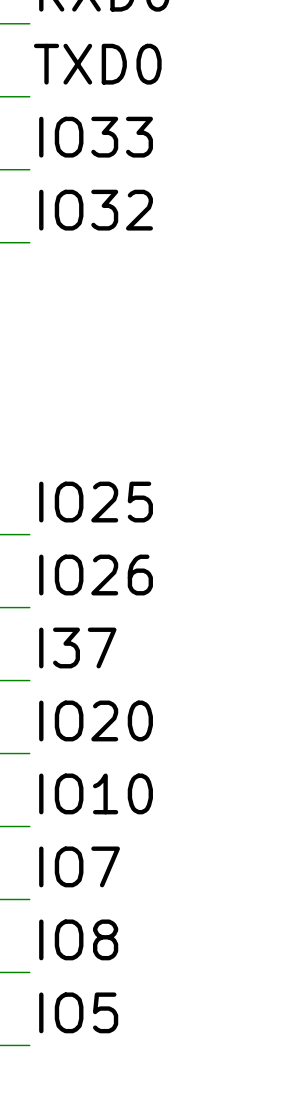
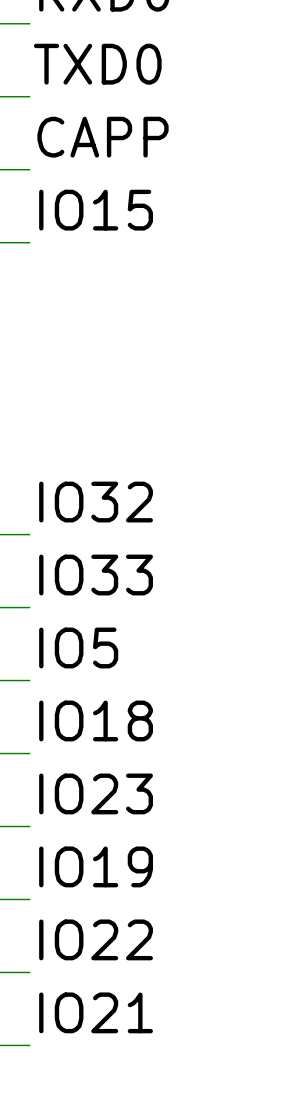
label: IO33 (96, 137) -> CAPP (102, 137)
label: IO32 (96, 210) -> IO15 (96, 210)
label: IO25 (96, 502) -> IO32 (96, 502)
label: IO26 (96, 575) -> IO33 (96, 575)
label: I37 (77, 648) -> IO5 (78, 648)
label: IO20 (96, 720) -> IO18 (96, 720)
label: IO10 (96, 793) -> IO23 (96, 793)
label: IO7 (79, 866) -> IO19 (96, 866)
label: IO8 (78, 939) -> IO22 (96, 939)
label: IO5 (78, 1012) -> IO21 (96, 1012)

